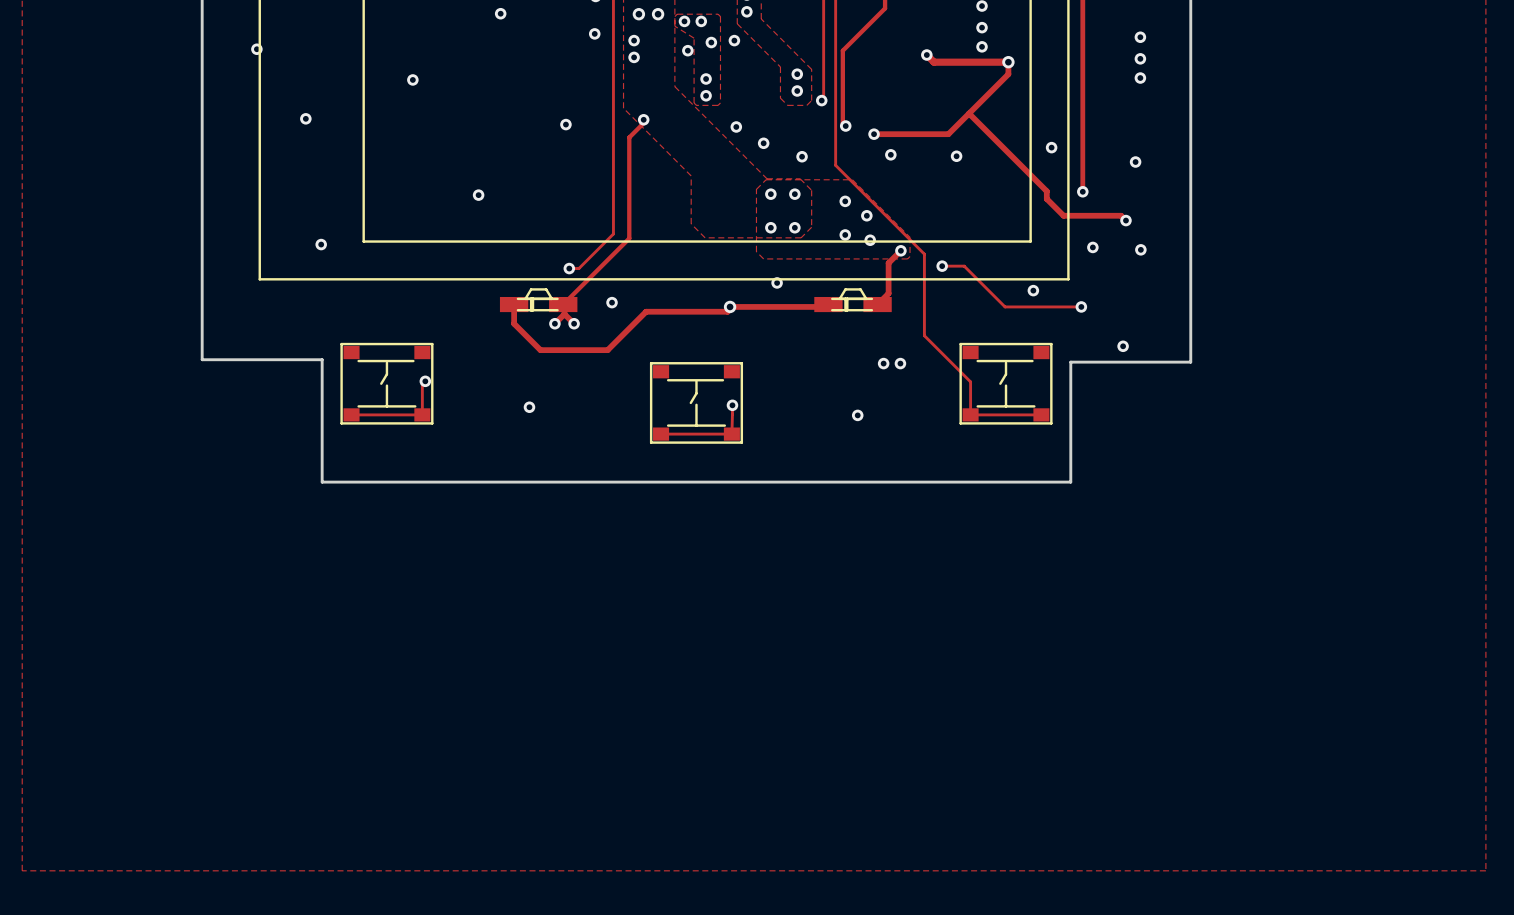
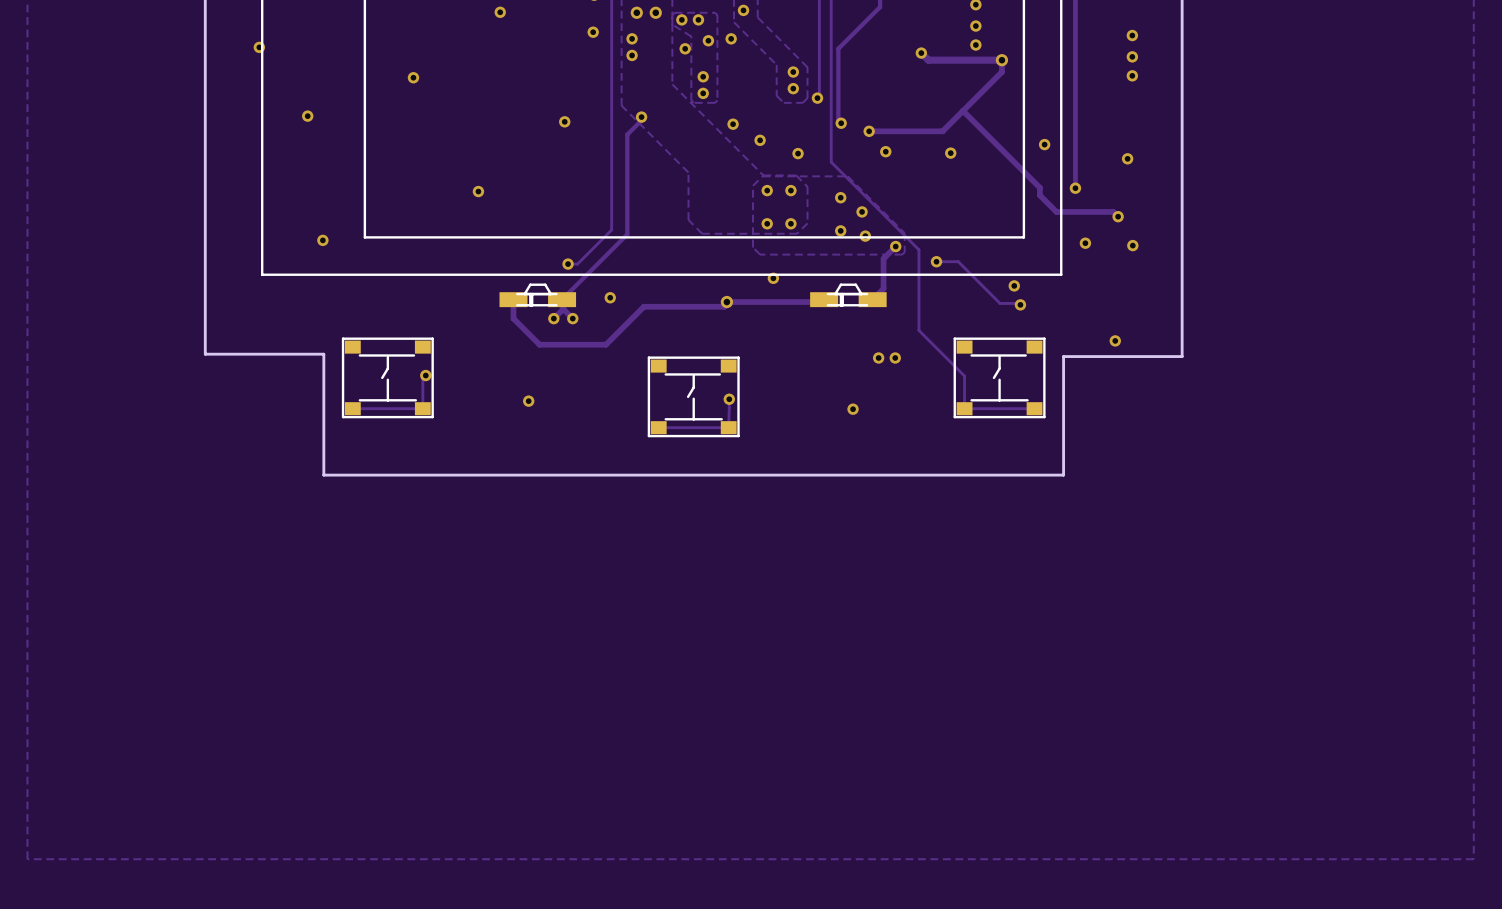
via: none -> (1014, 285)
via: (1033, 290) -> none
track: (1005, 306) (1081, 306) -> (998, 302) (1020, 304)
via: (1081, 306) -> none
via: none -> (1020, 304)

